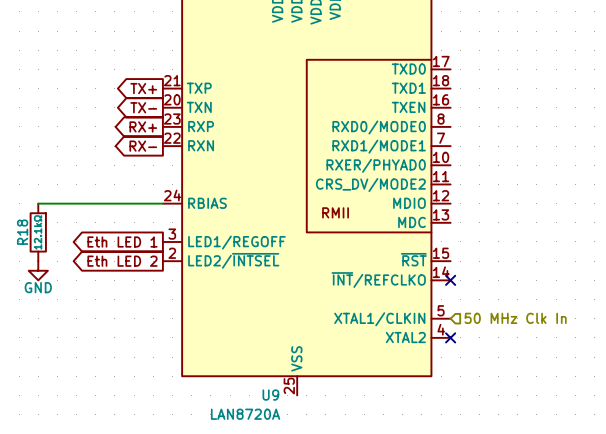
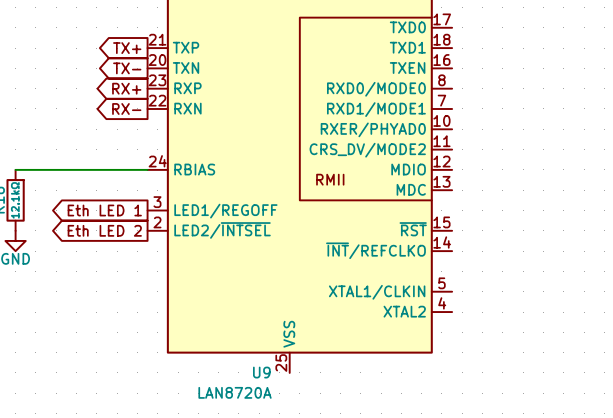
no-connect mark: (450, 280) -> none
hierarchical label: 50 MHz Clk In (515, 318) -> none
no-connect mark: (450, 337) -> none

